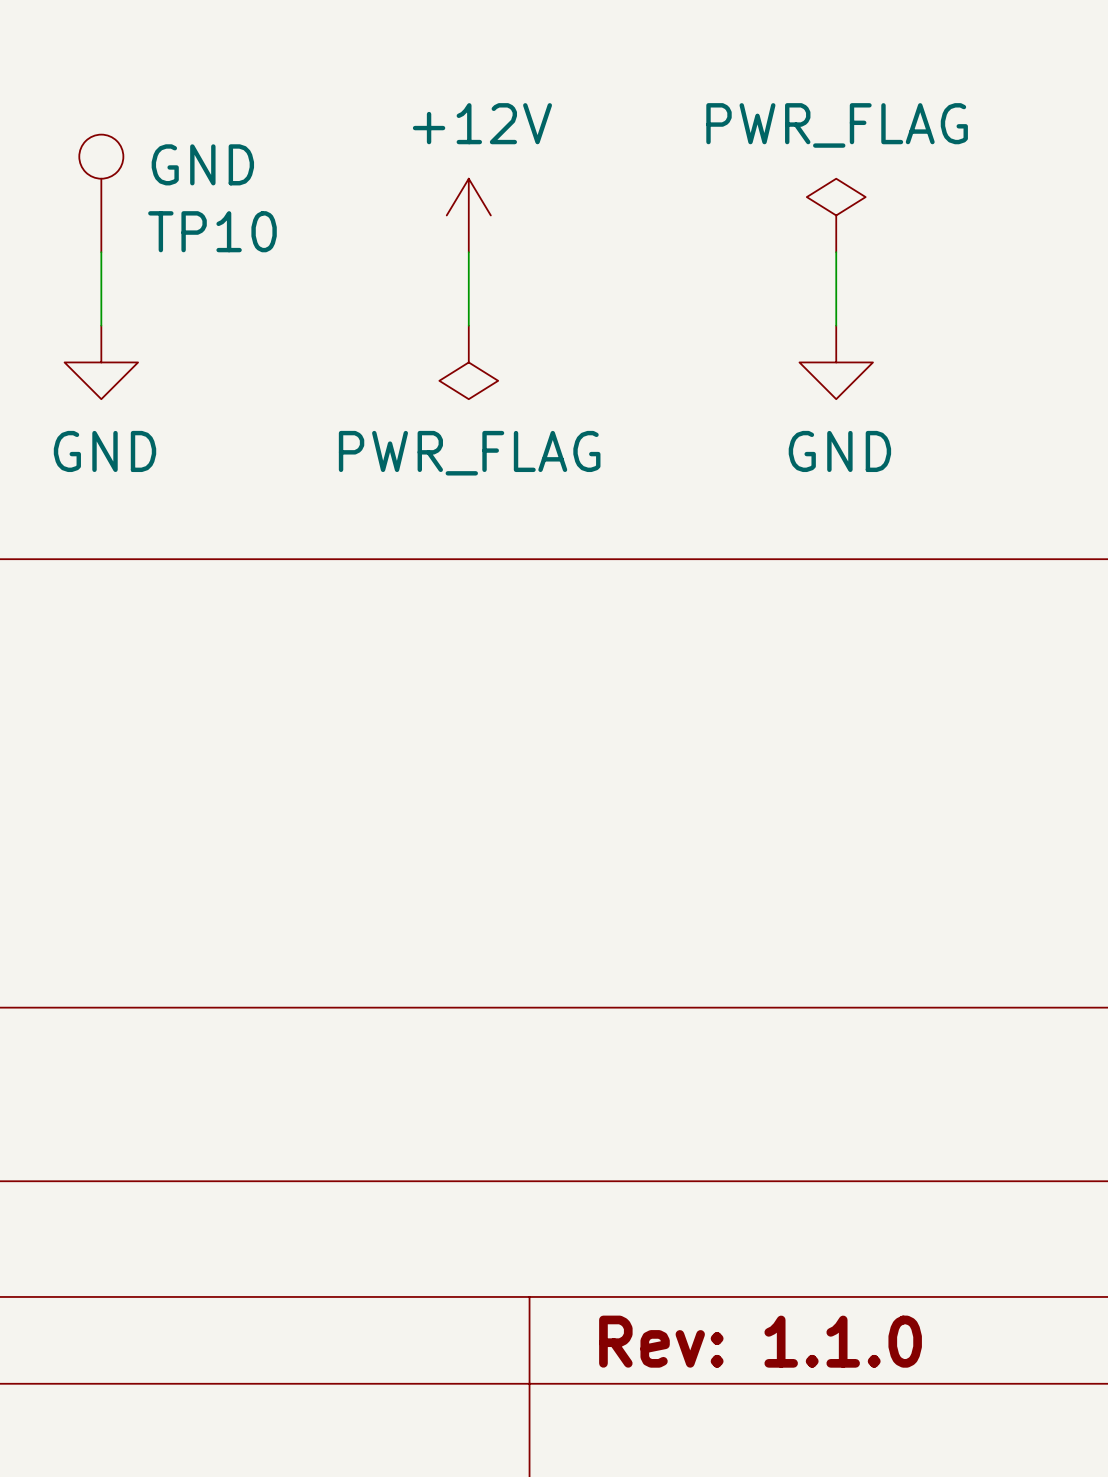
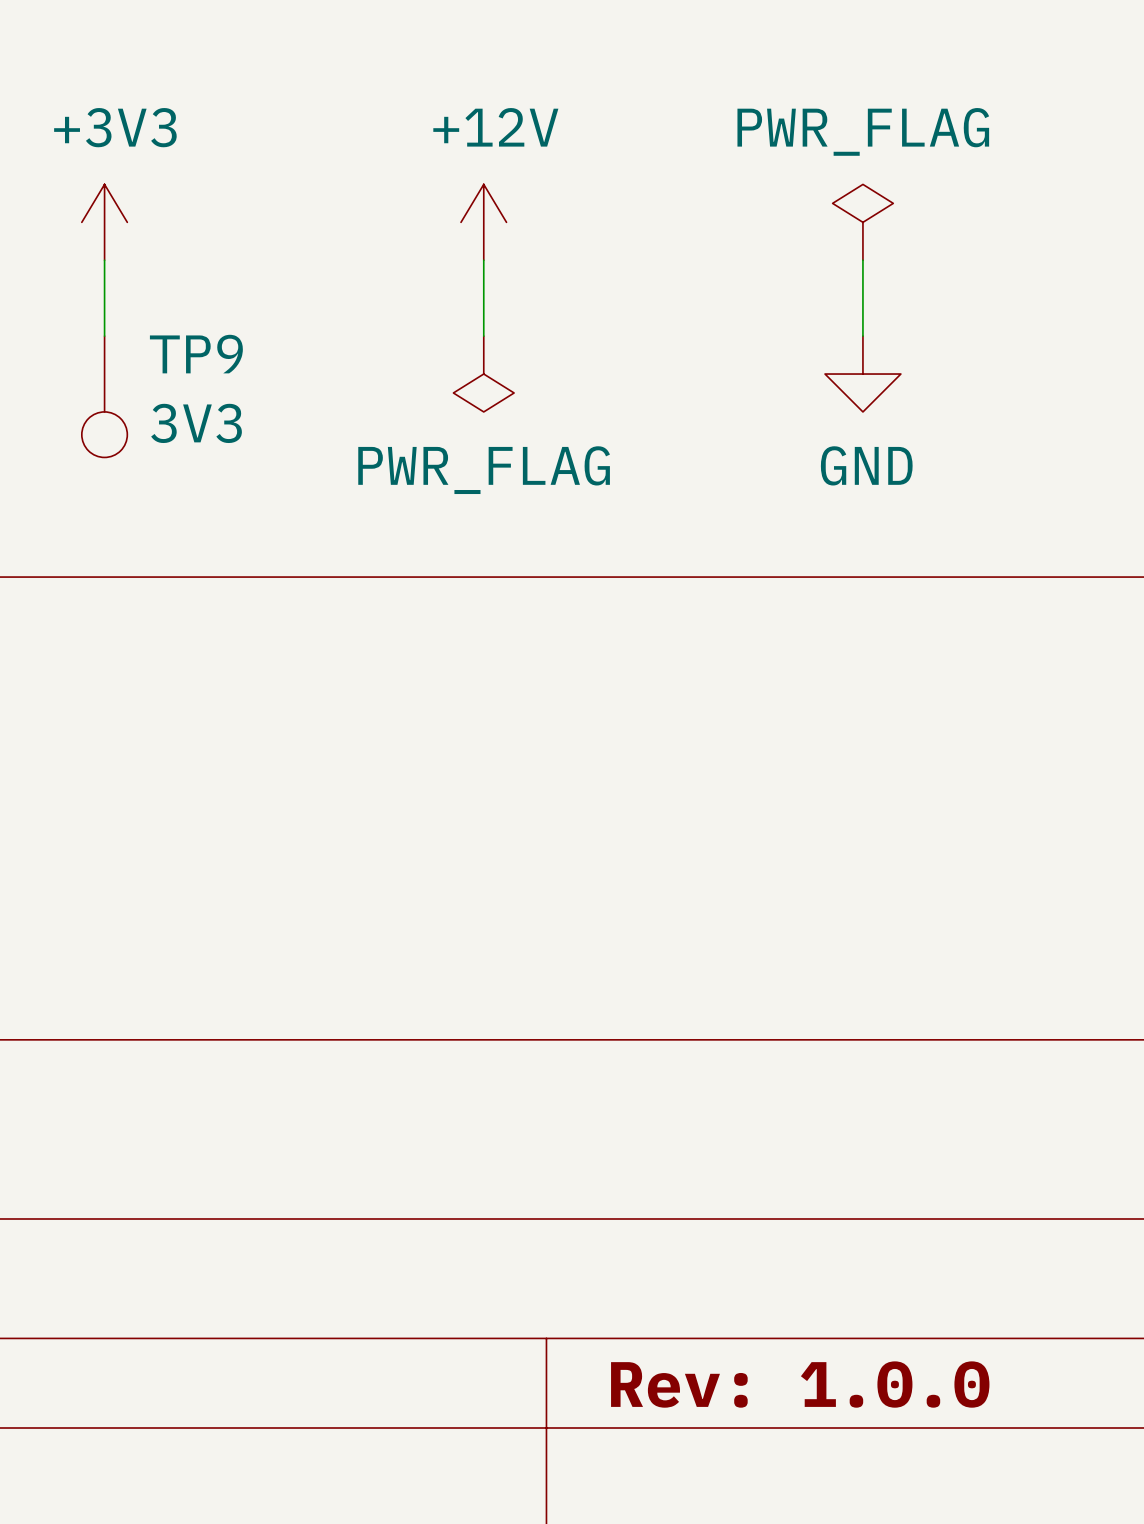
TP10: GND (101, 193) -> none
power symbol: none -> +3V3 (104, 222)
power symbol: GND (101, 362) -> none
TP9: none -> 3V3 (104, 396)
title block: Rev: 1.1.0 (760, 1341) -> Rev: 1.0.0 (800, 1384)

